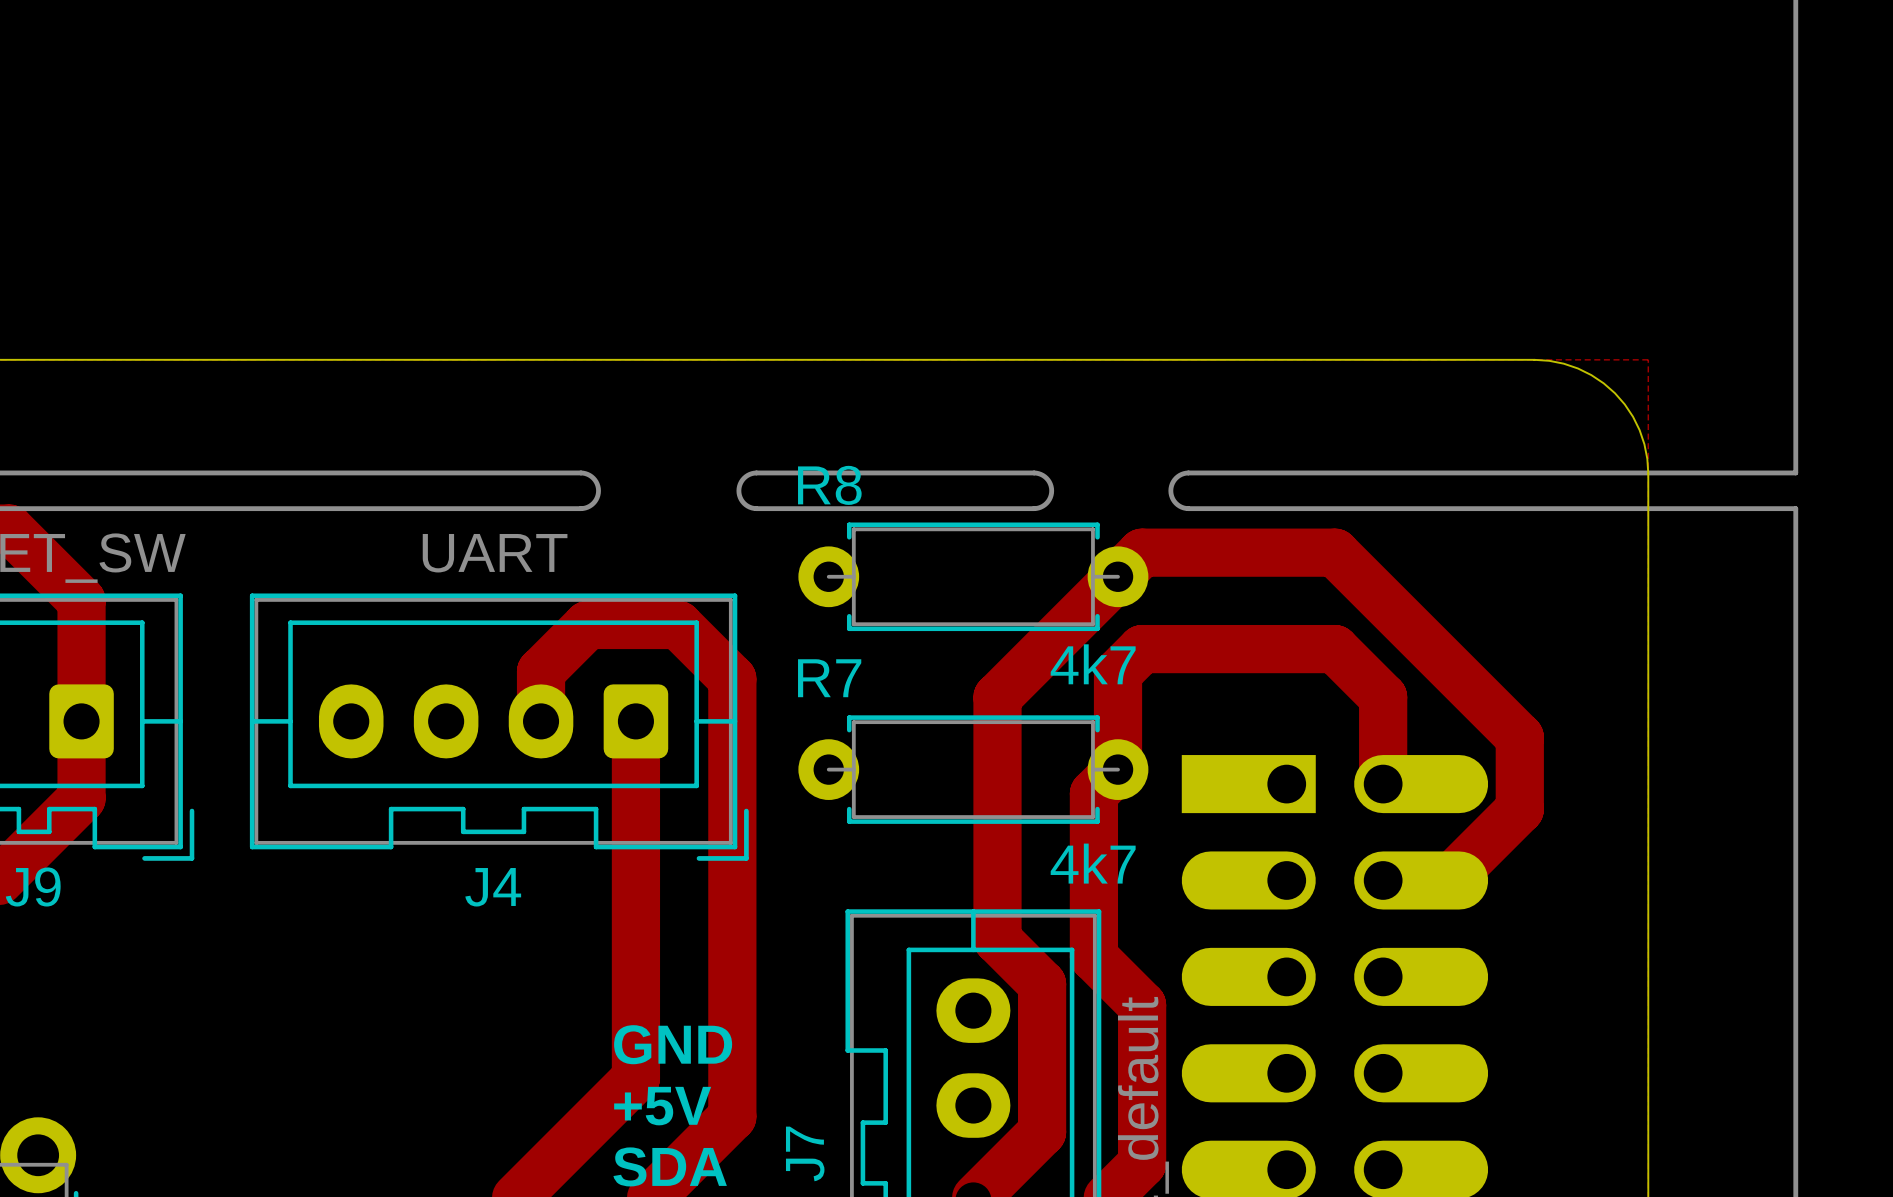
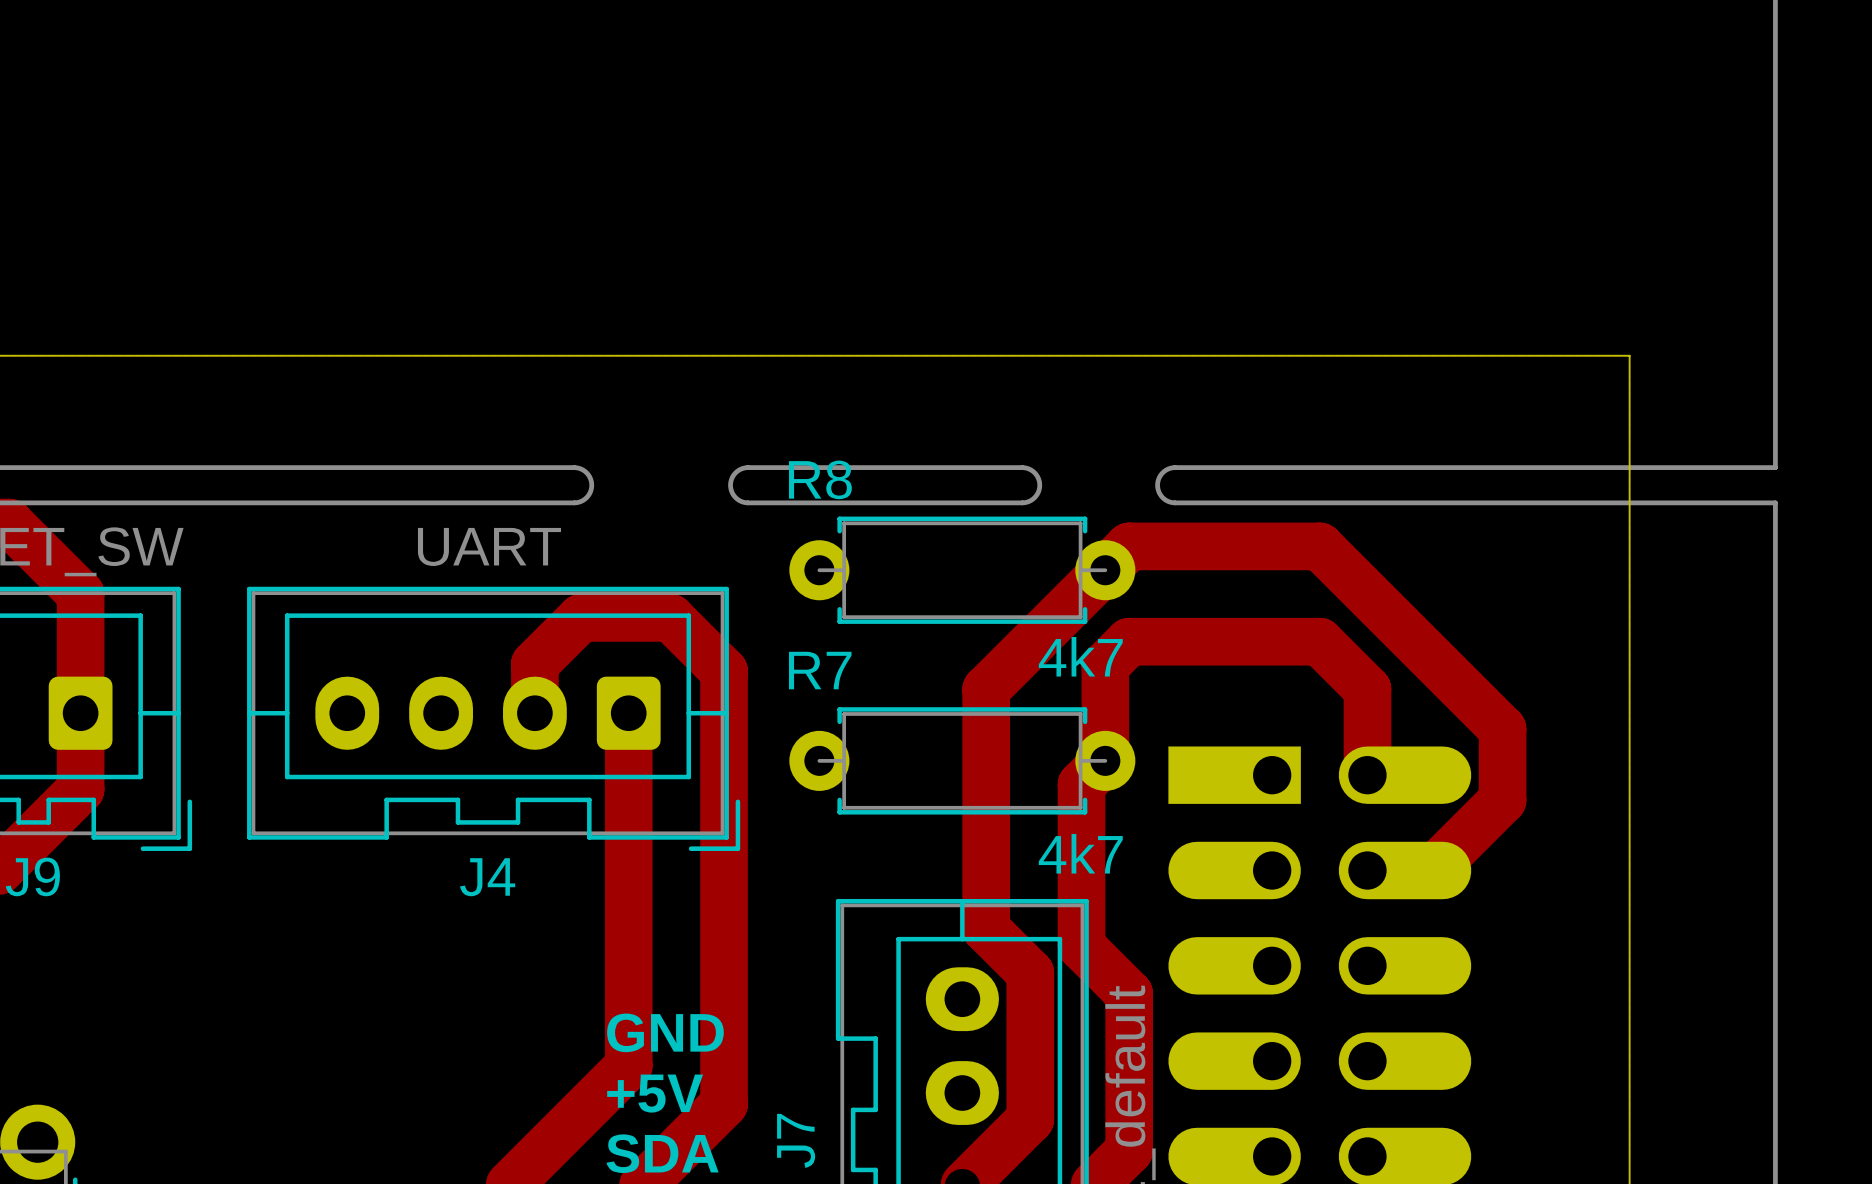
board edge: (1534, 359) (1563, 363) (1578, 368) (1603, 383) (1614, 393) (1633, 416) (1639, 430) (1647, 458) (1648, 473) -> (1517, 355) (1629, 355) (1629, 468)

